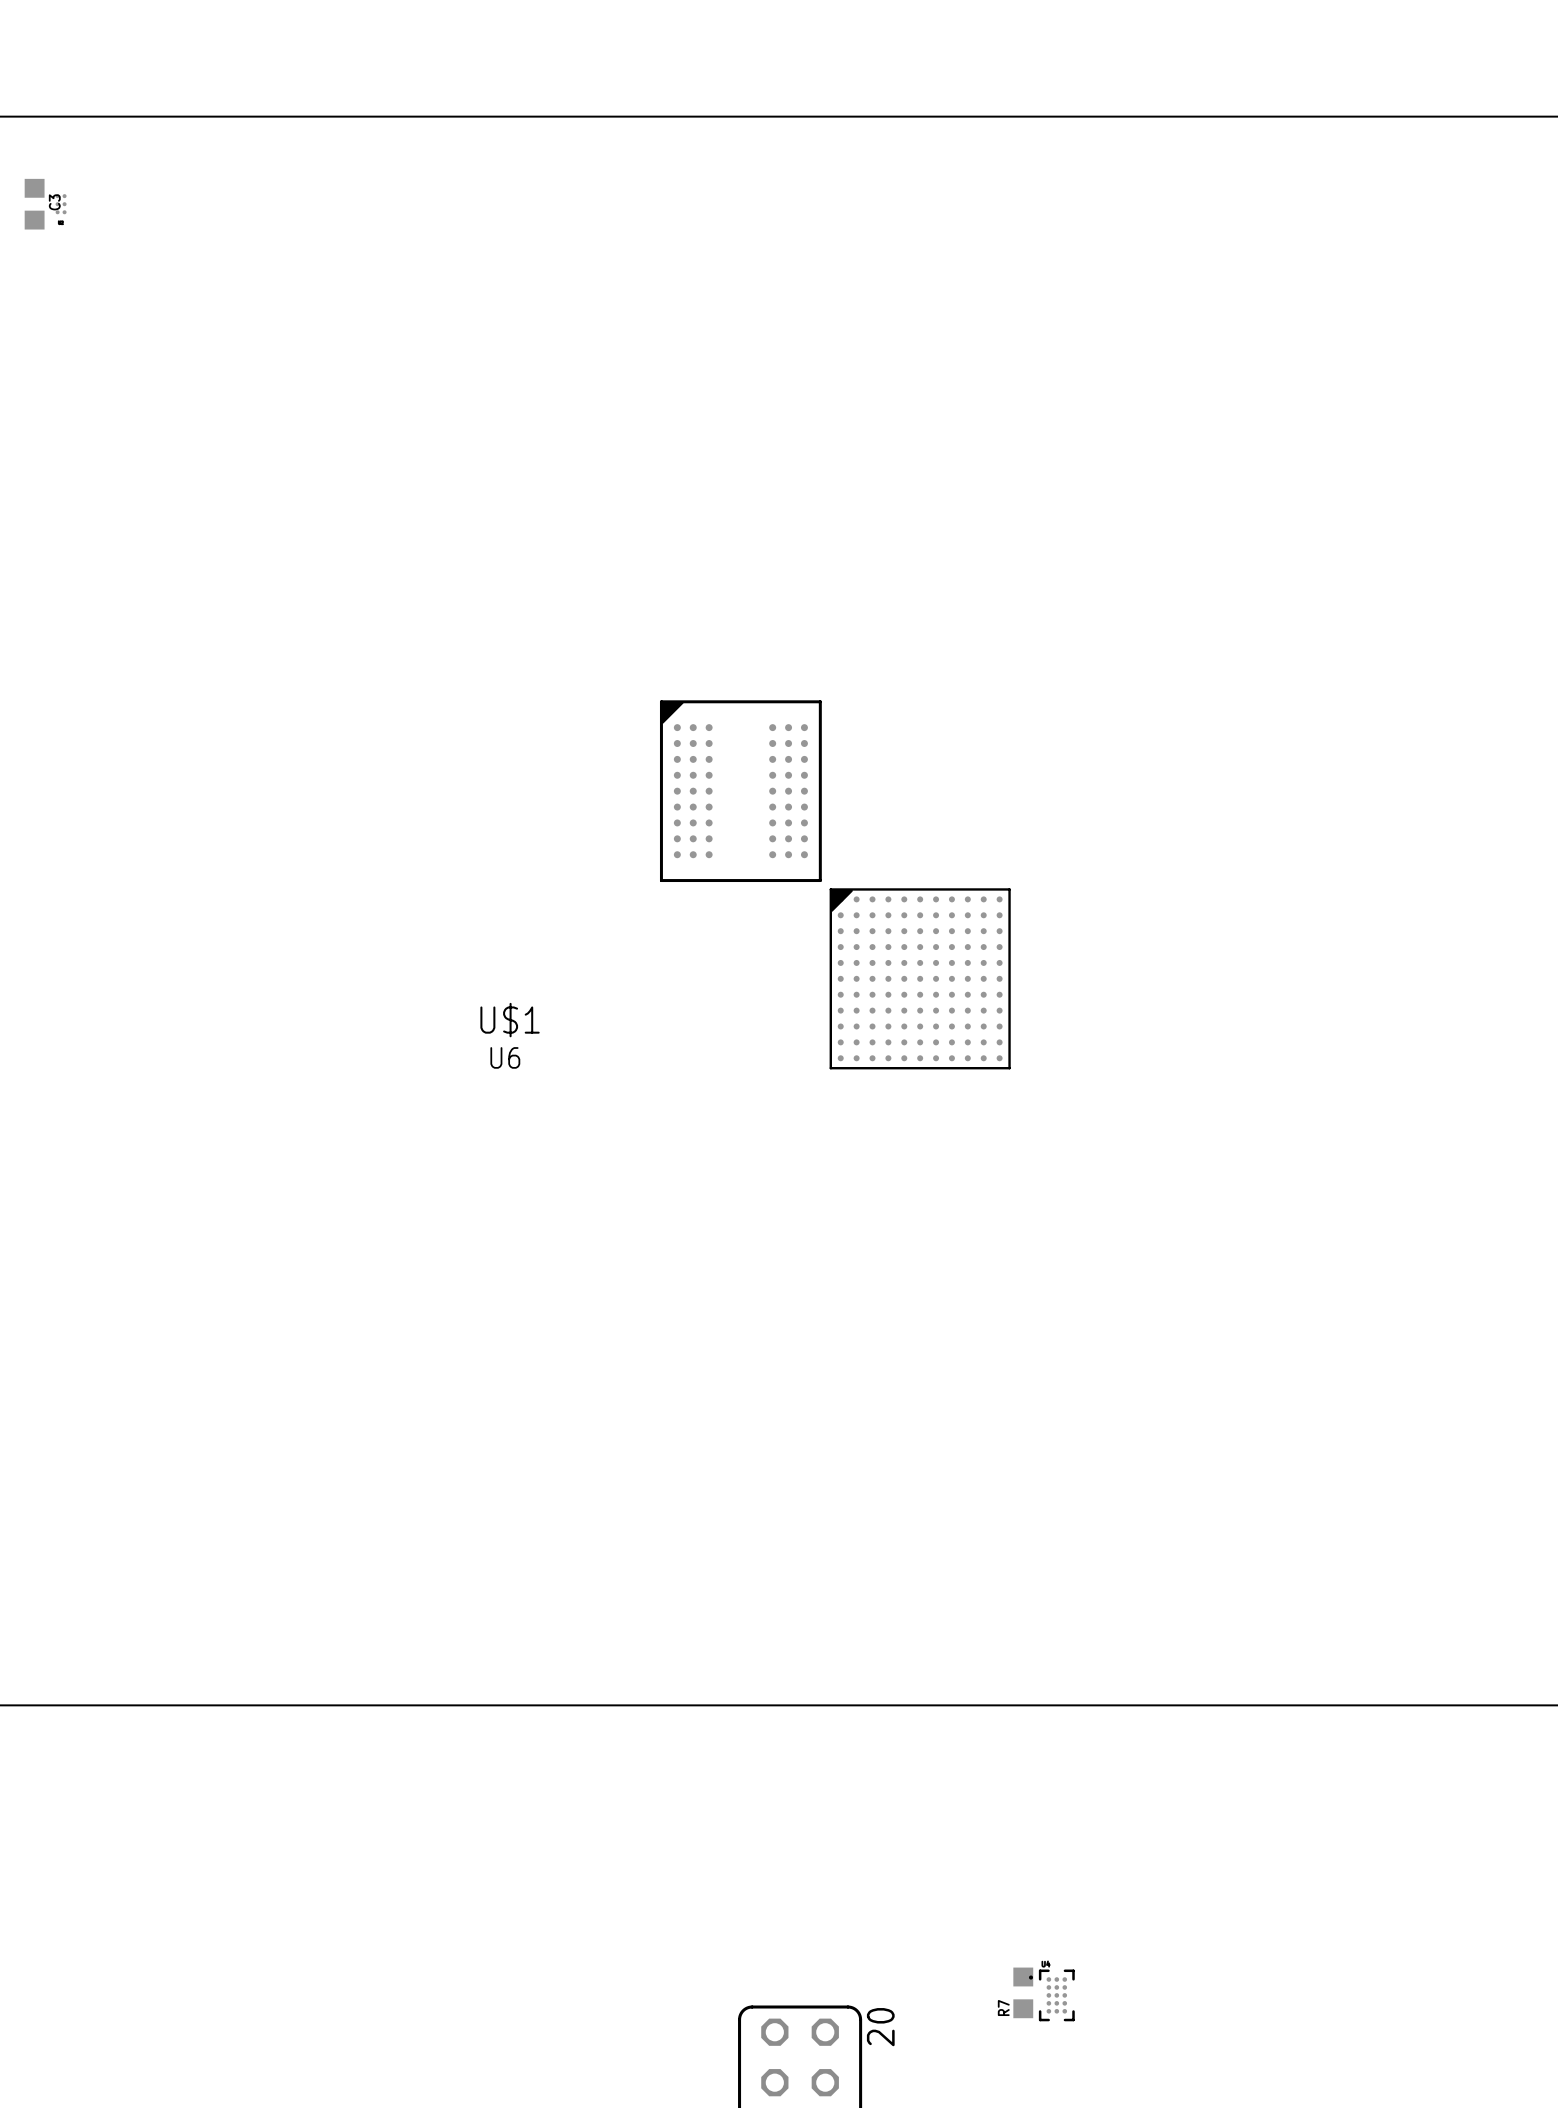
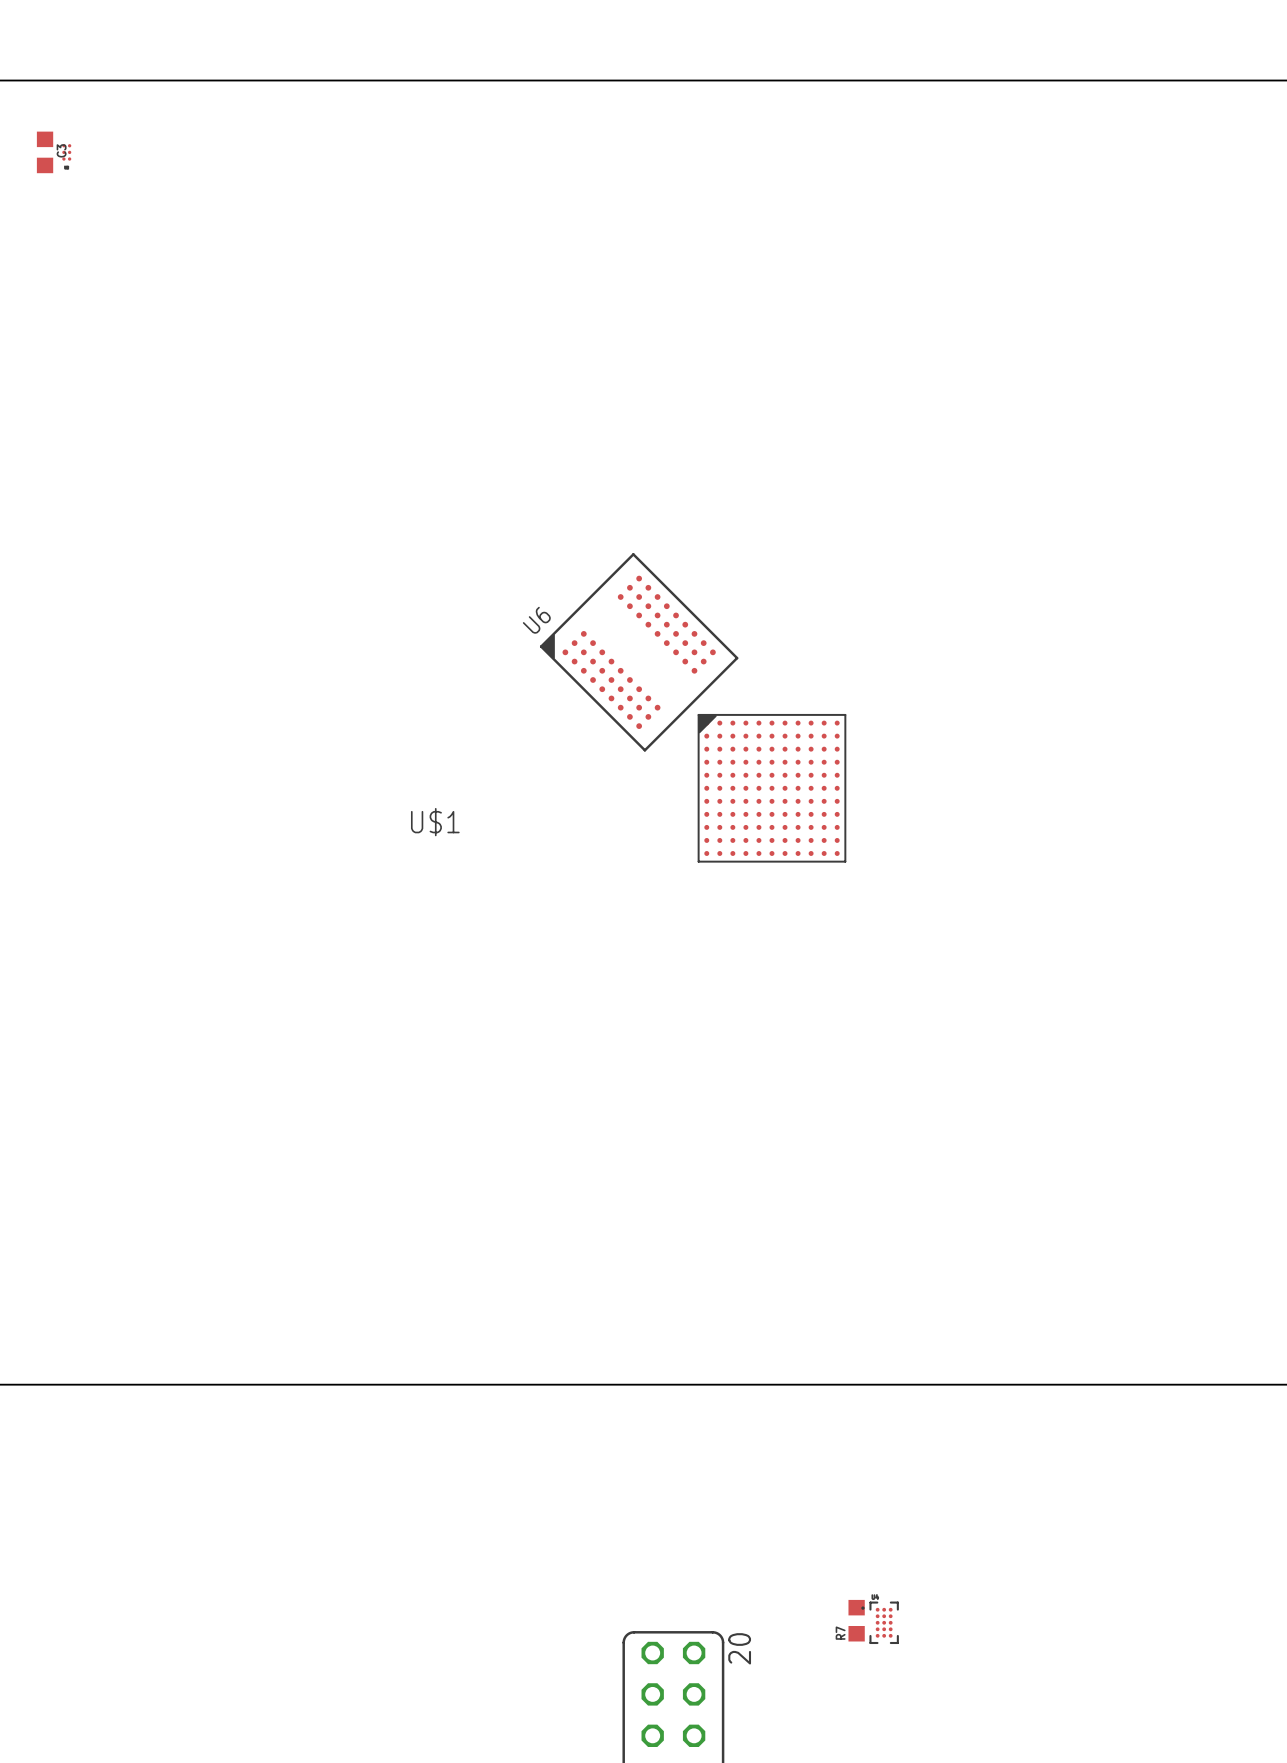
U6 rotation: 0° (740, 791) -> 45° counterclockwise (639, 652)
U6 name position: U6 (505, 1057) -> U6 (536, 620)

